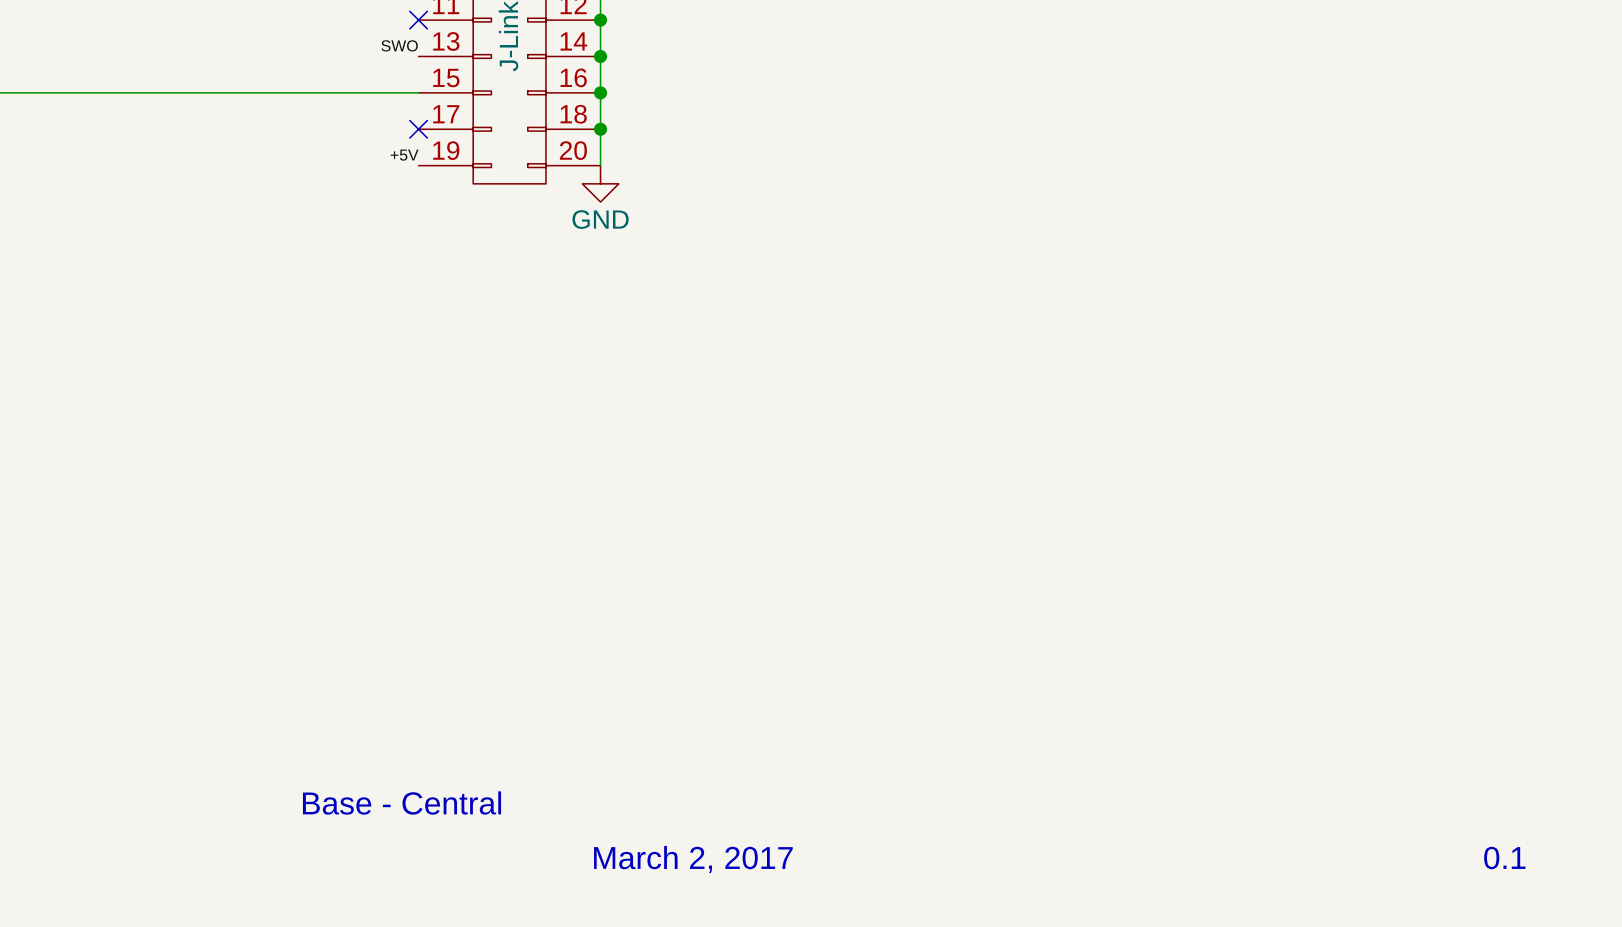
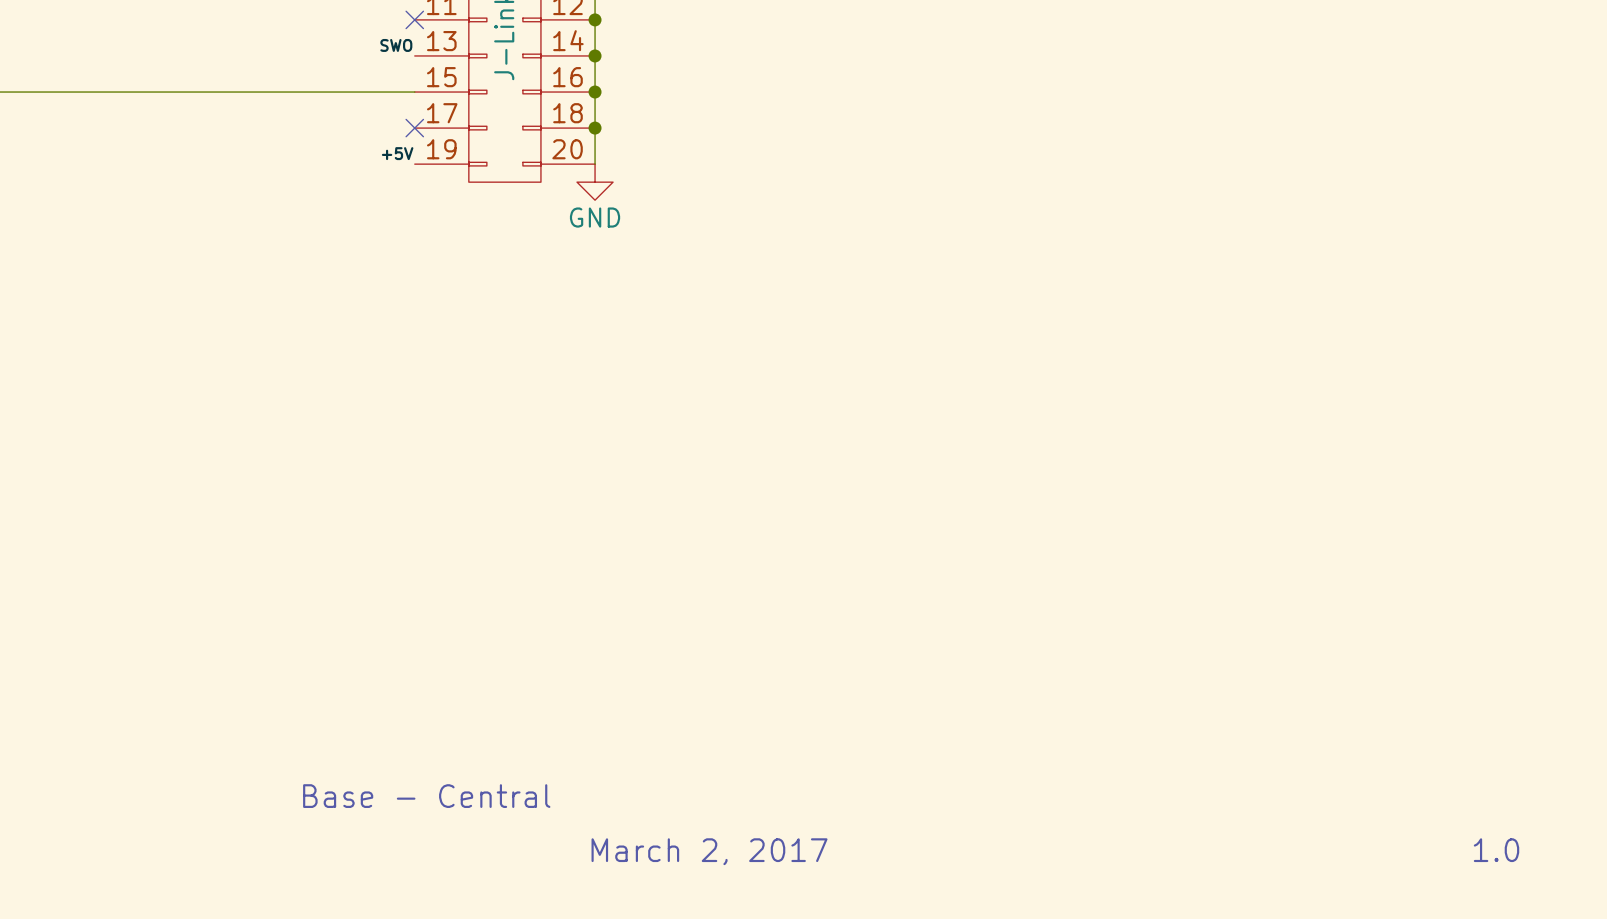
text: 0.1 (1504, 858) -> 1.0 (1496, 850)

